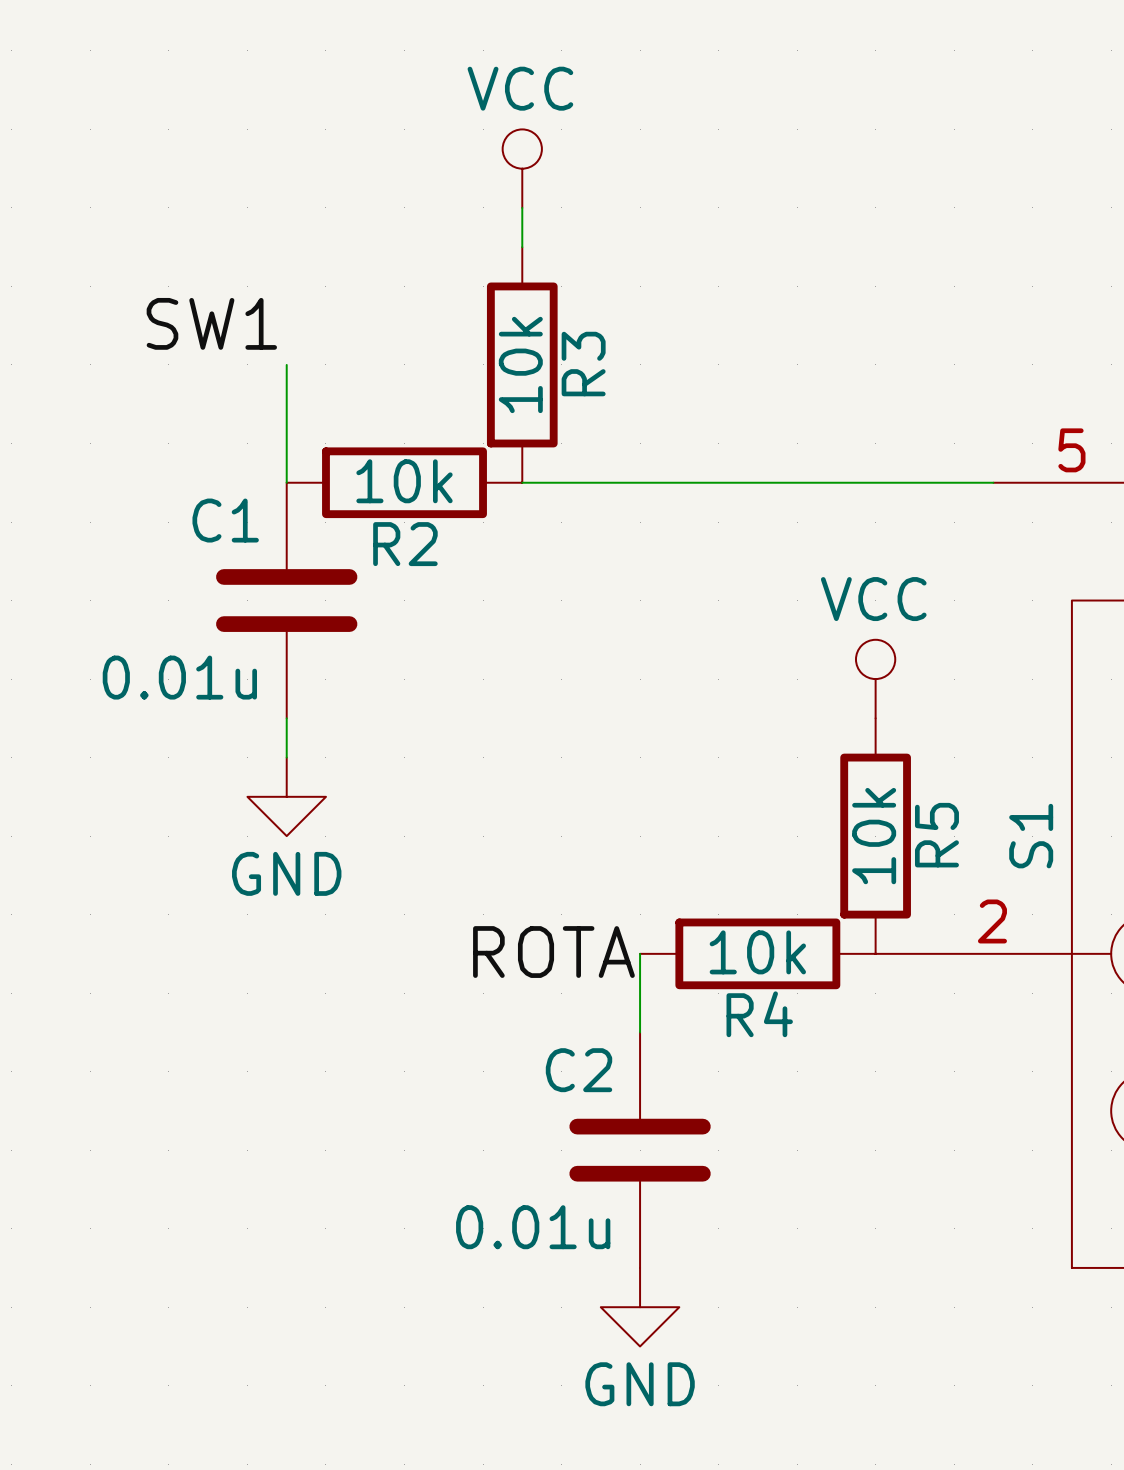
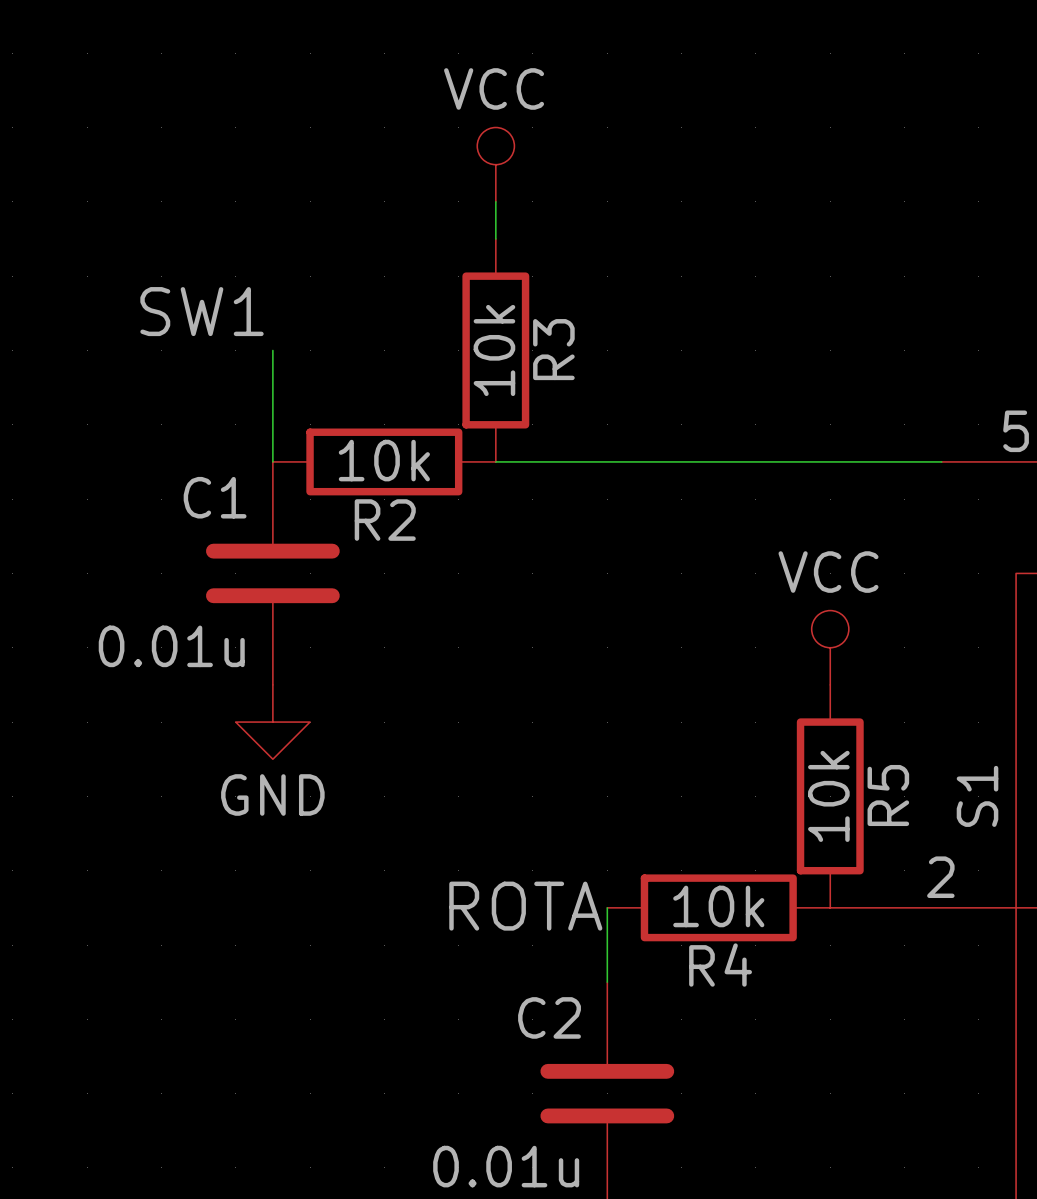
power symbol position: GND (286, 796) -> GND (272, 722)

